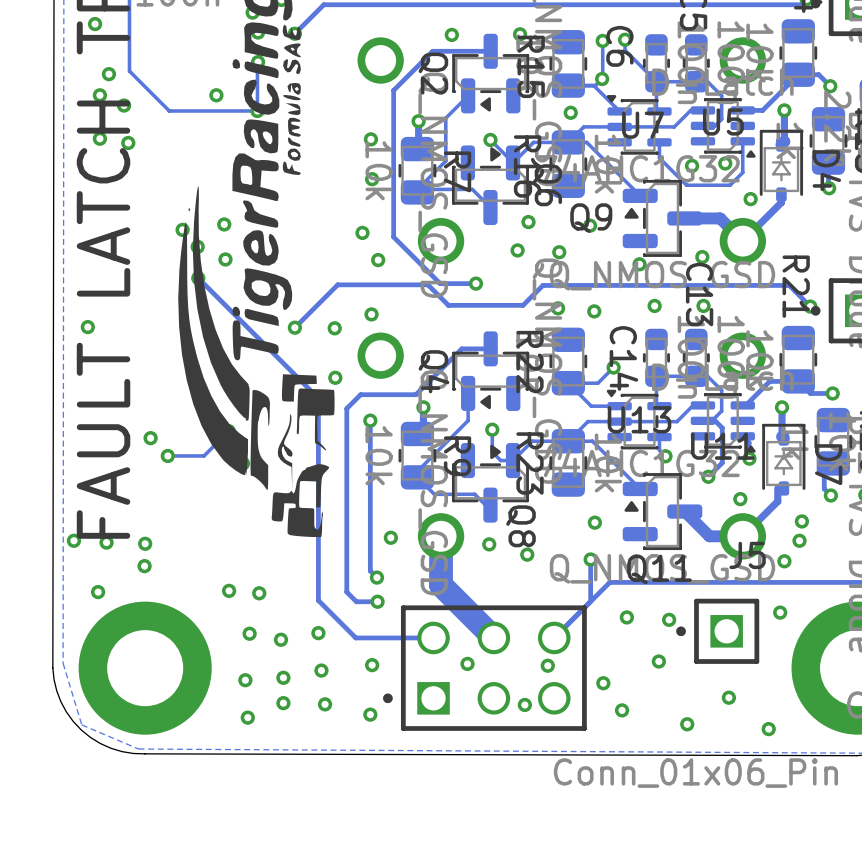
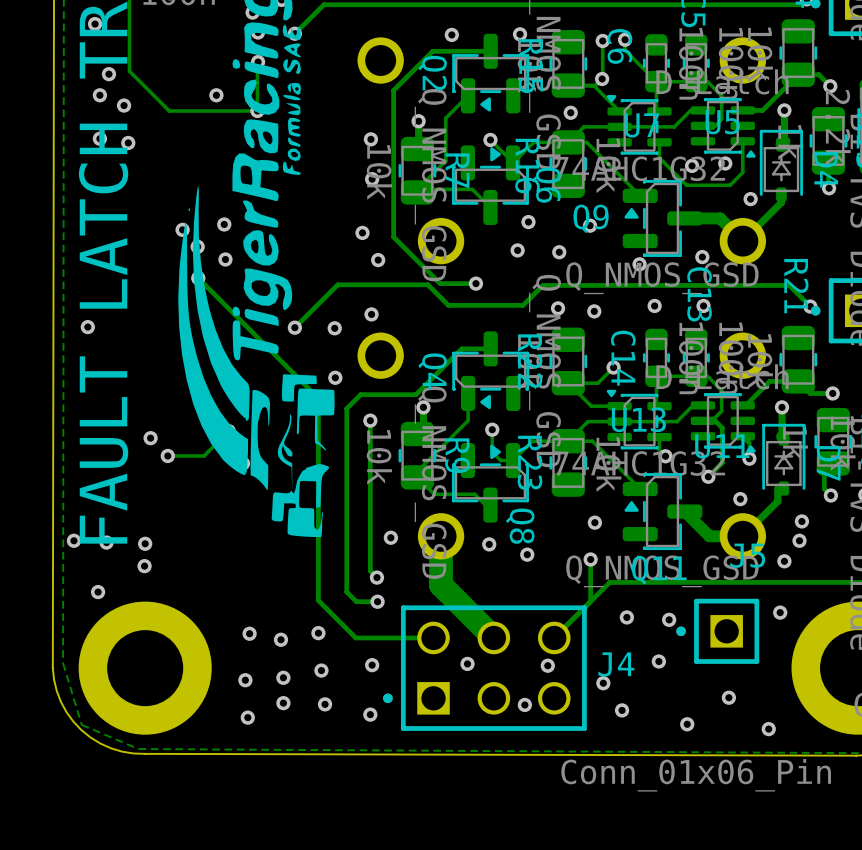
via: (229, 590) -> none
via: (259, 593) -> none
J4 name: none -> J4 (616, 664)

